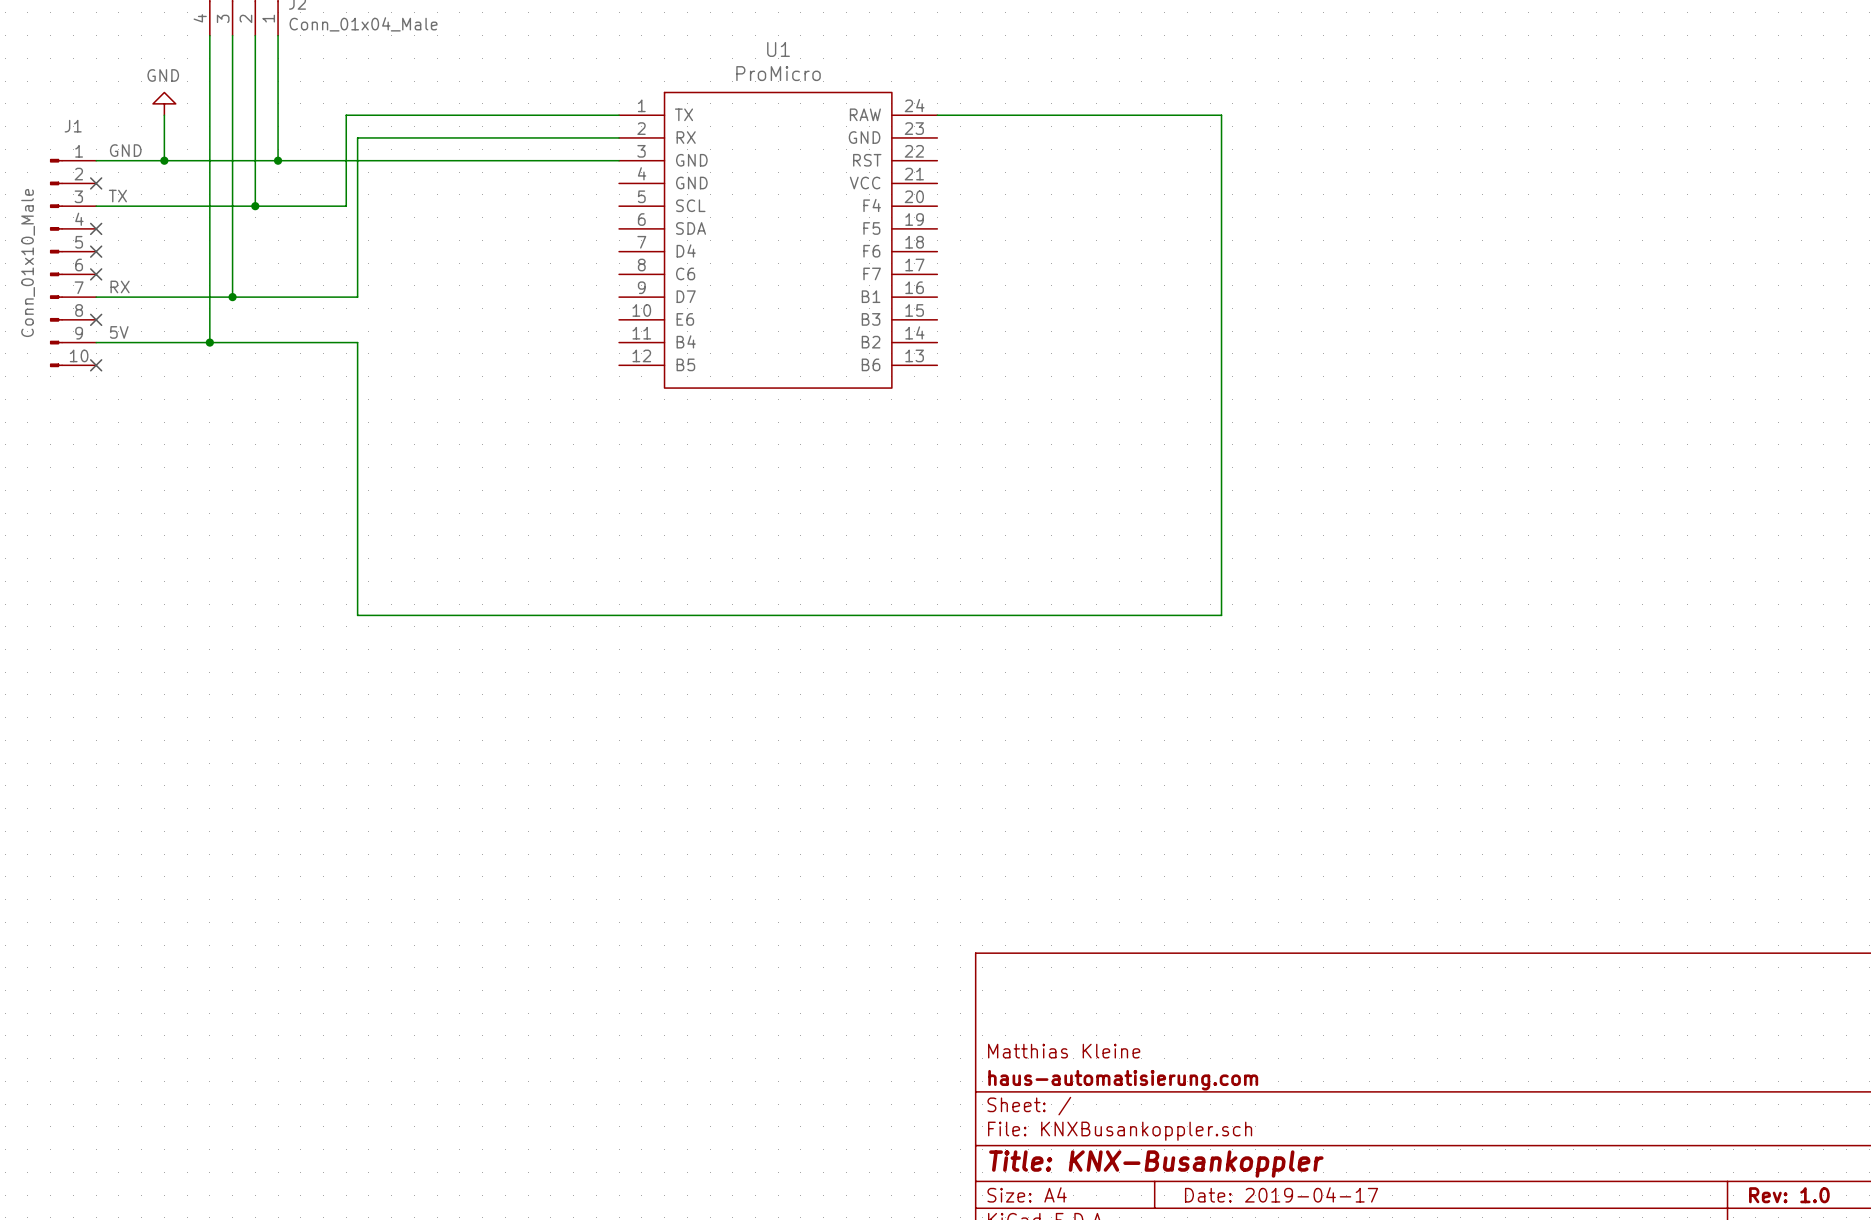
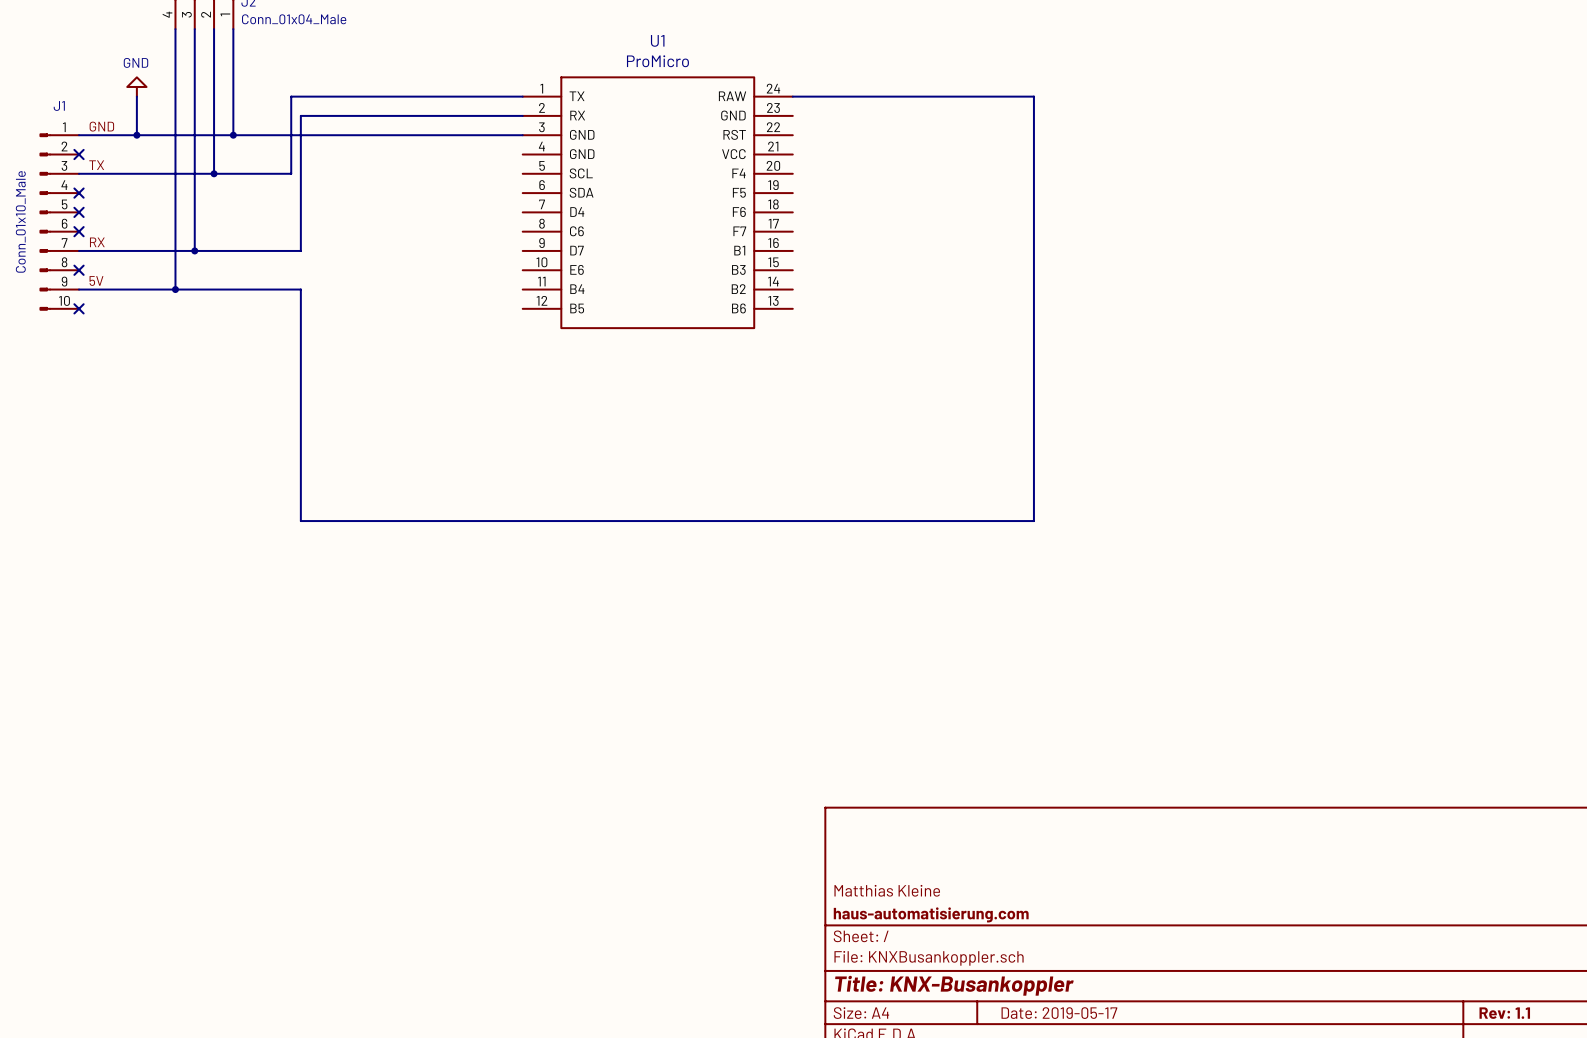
title block: Date: 2019-04-17 (1281, 1194) -> Date: 2019-05-17 (1059, 1013)
title block: Rev: 1.0 (1789, 1195) -> Rev: 1.1 (1504, 1013)

